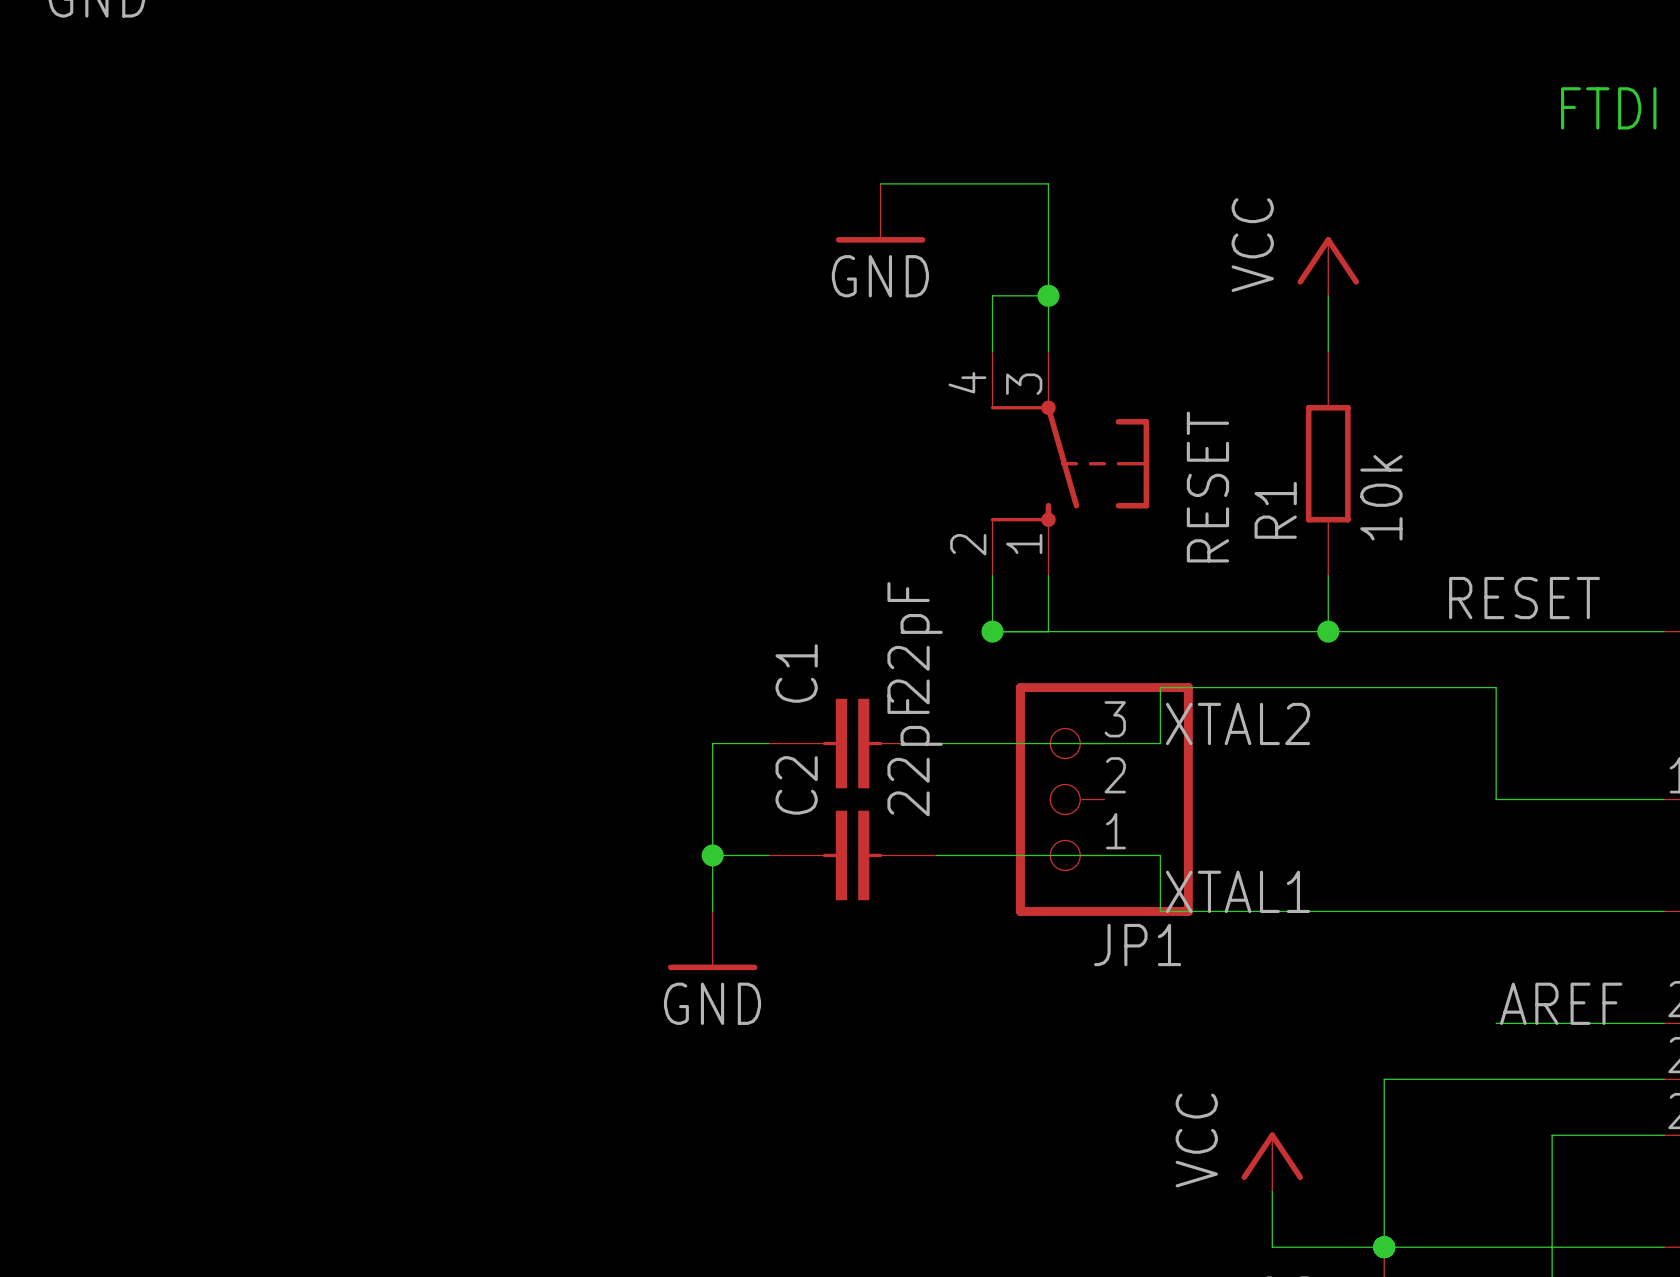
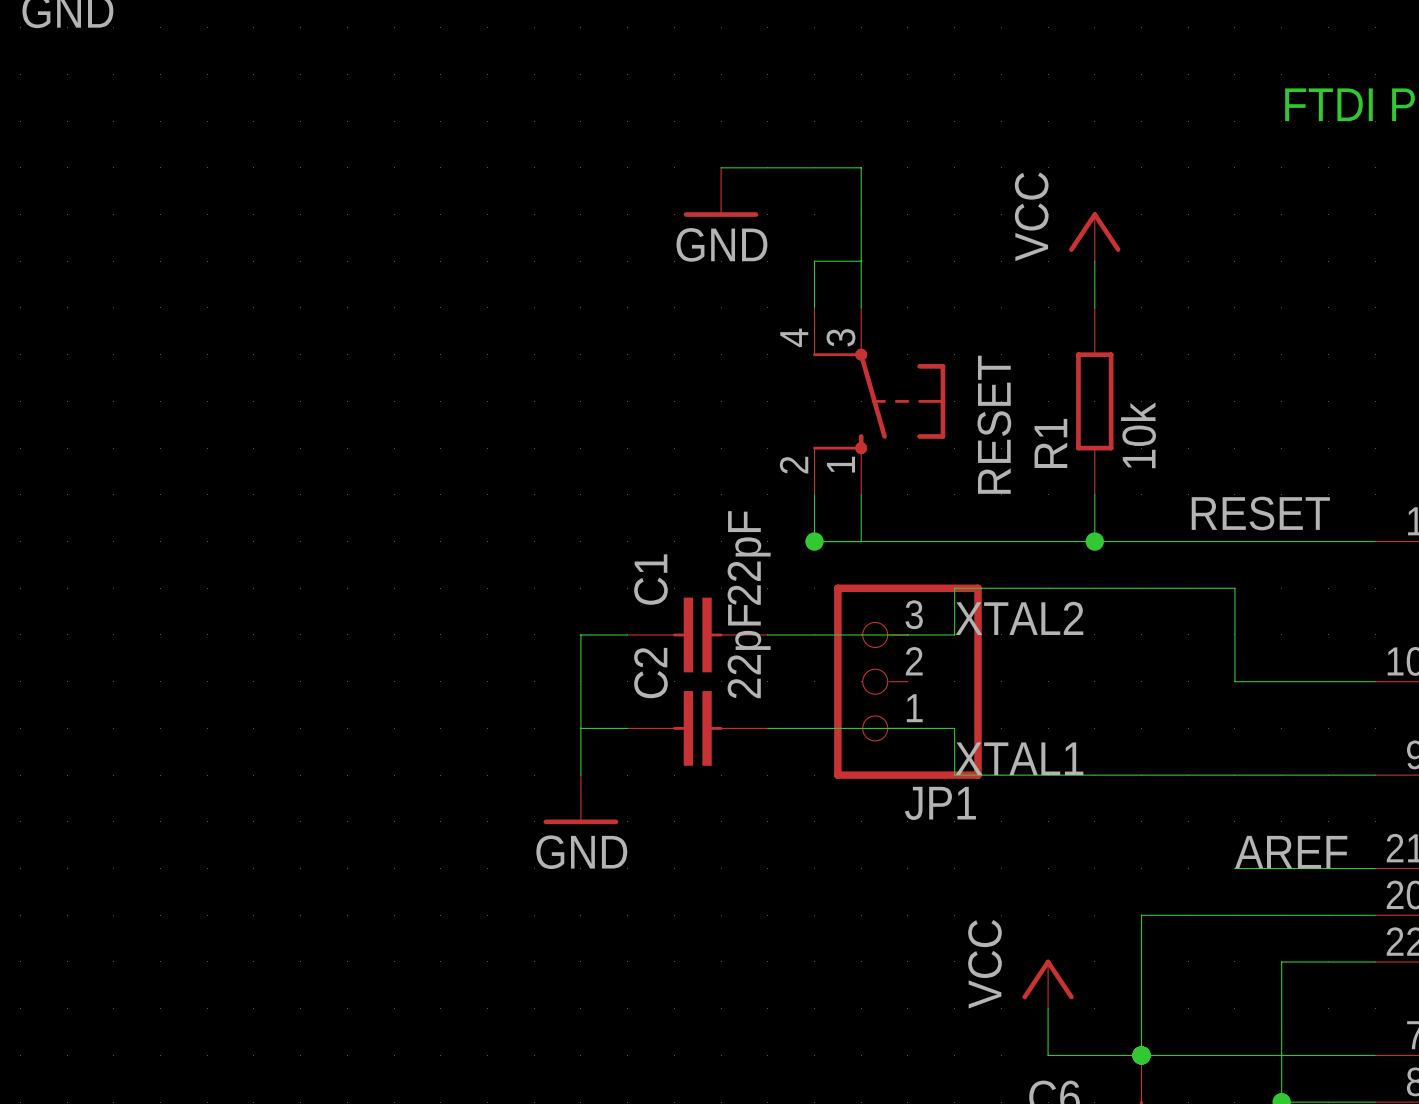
junction: (1048, 295) -> none
junction: (712, 855) -> none

